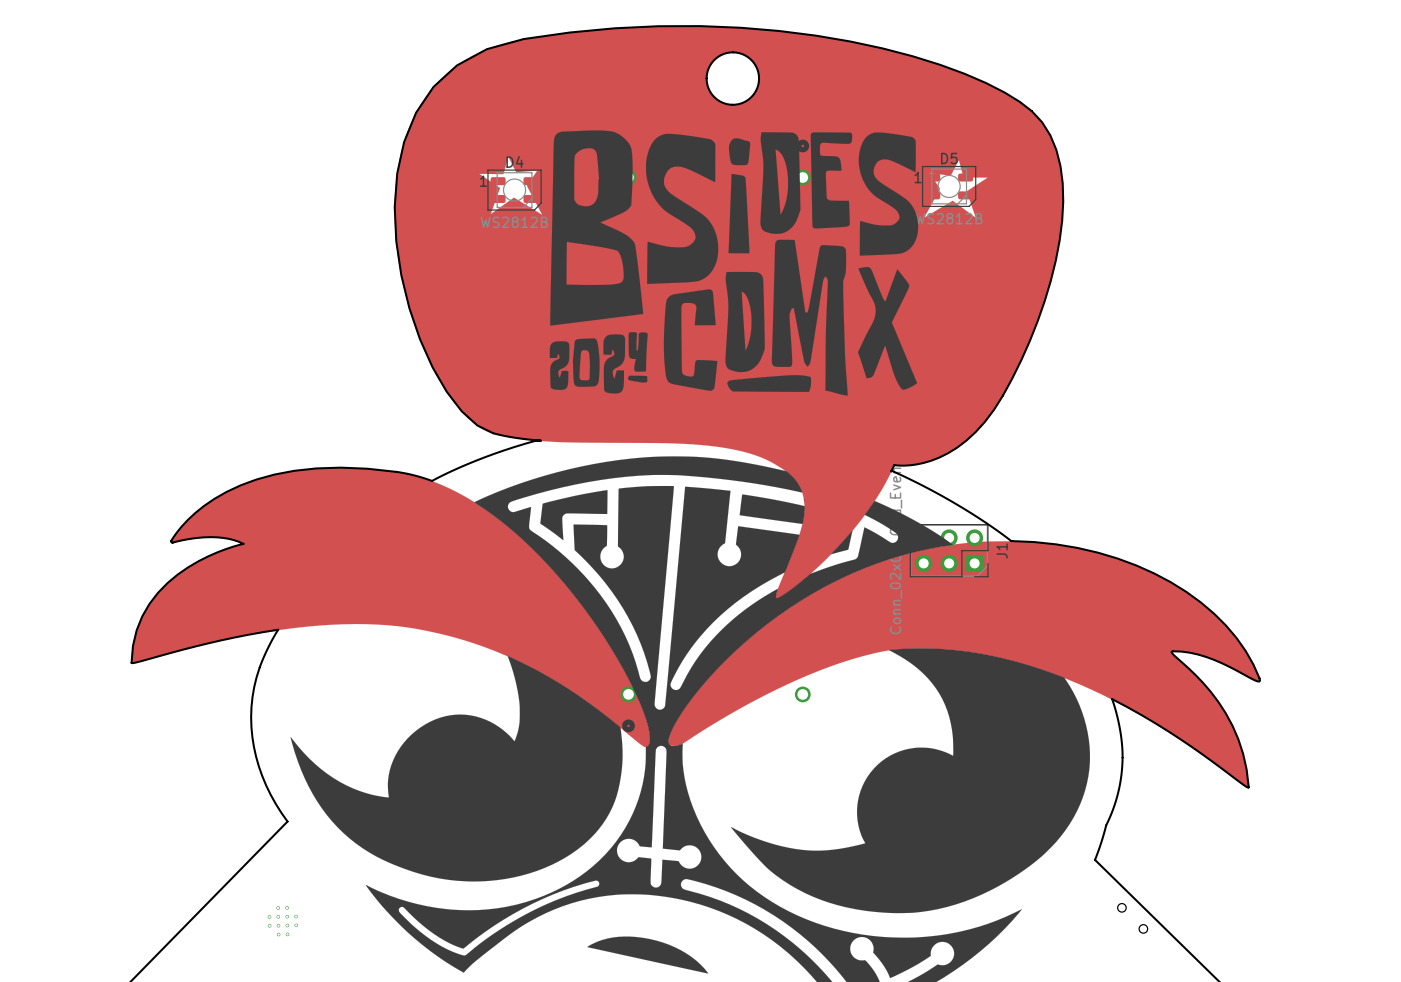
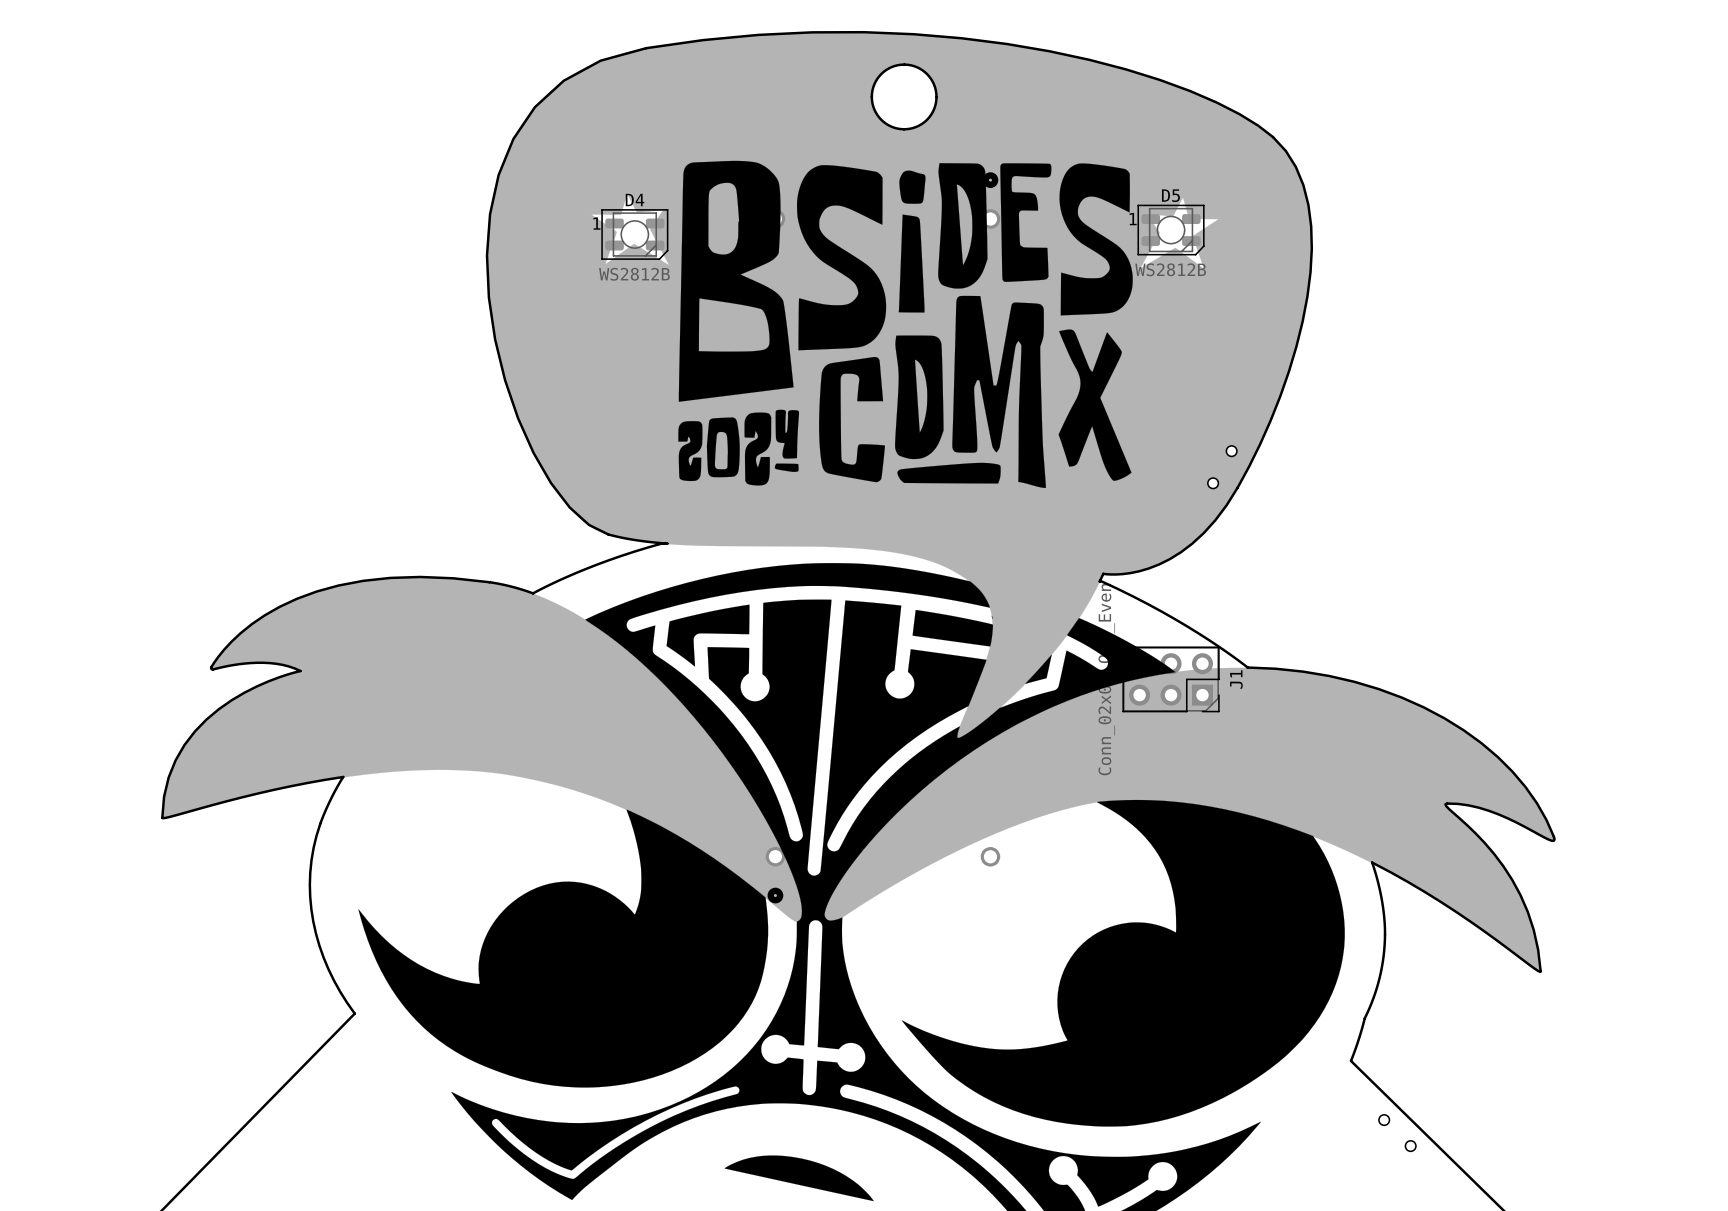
part: none -> (1222, 467)
part: (282, 921) -> none

